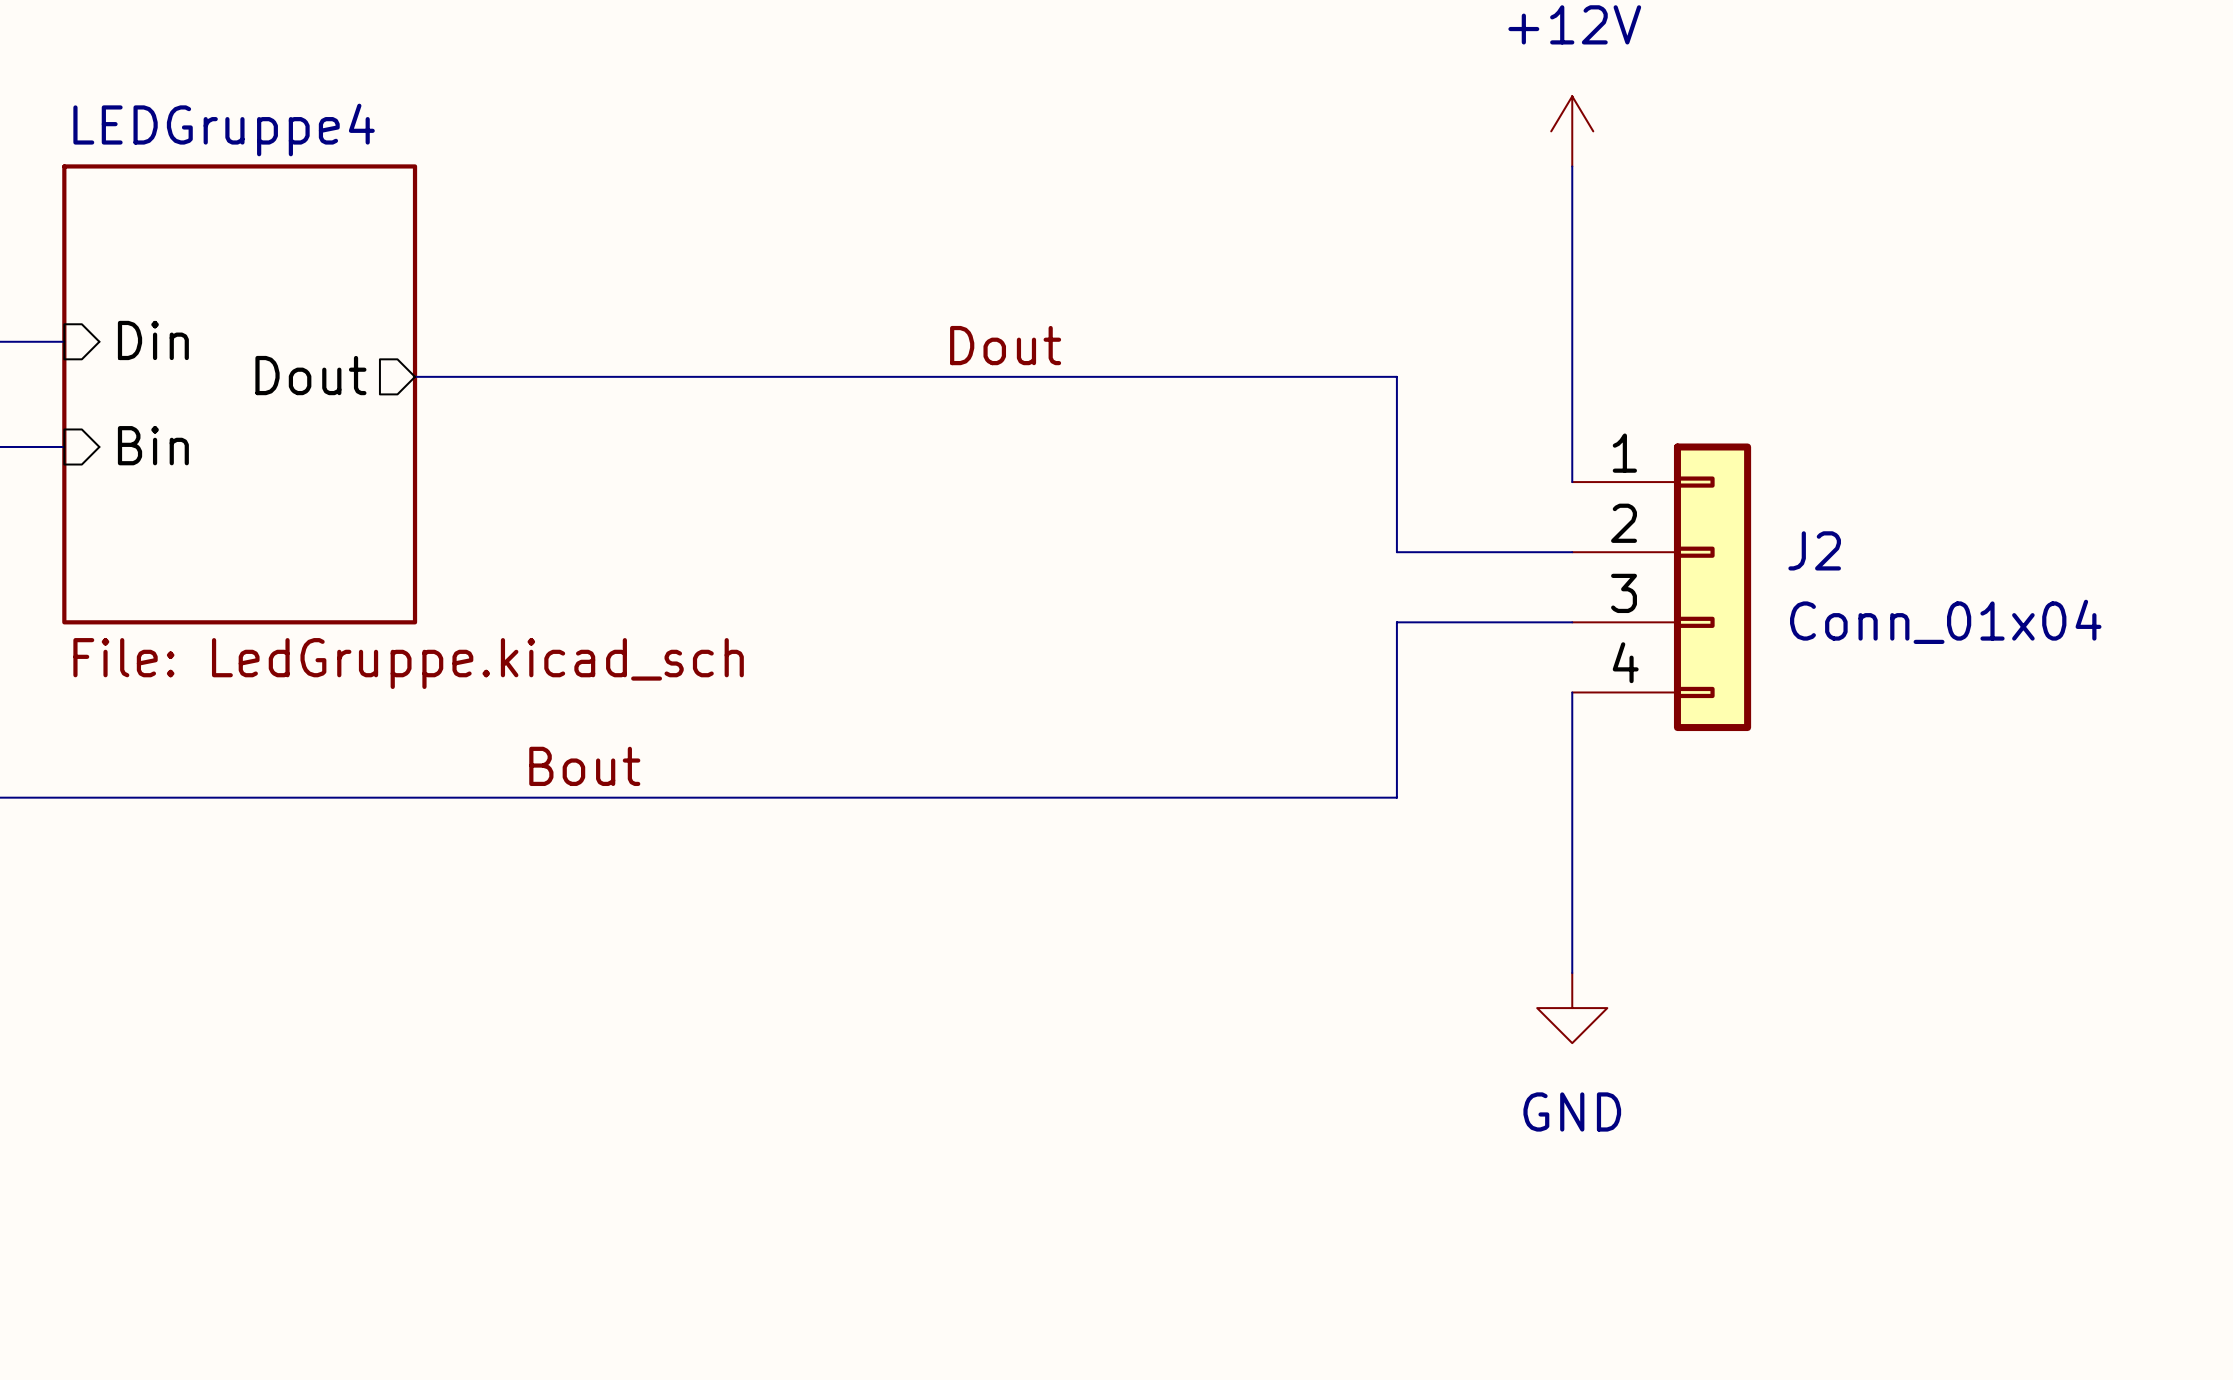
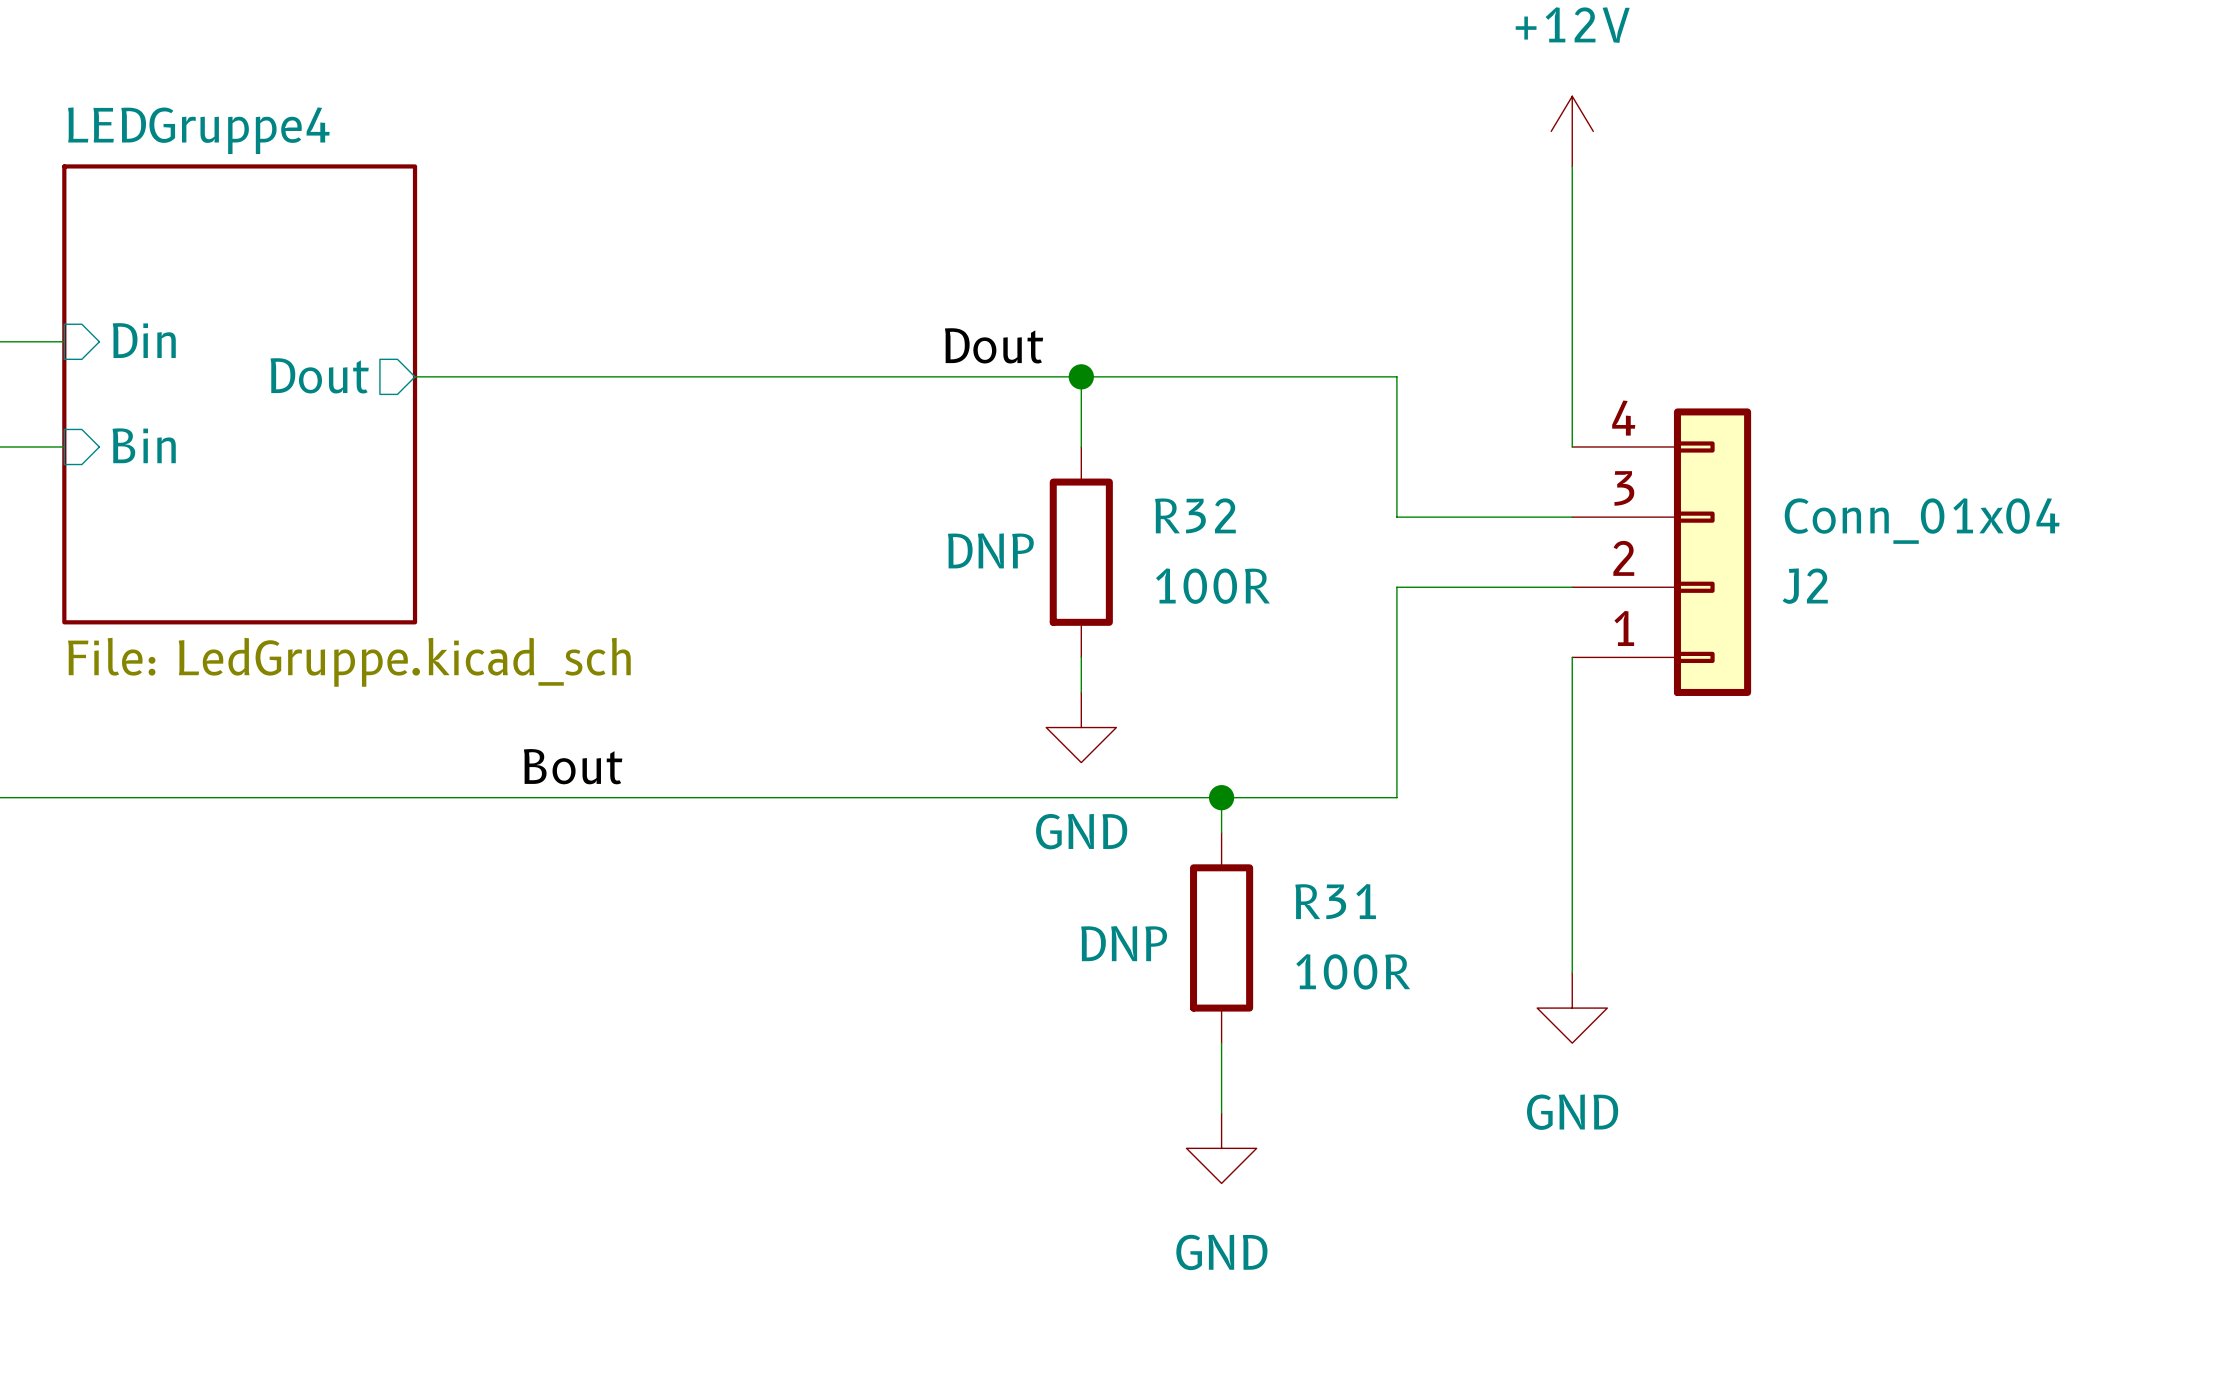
wire: none -> (1081, 376) (1081, 446)
junction: none -> (1081, 376)
wire: (1572, 446) (1572, 482) -> (1572, 657) (1572, 692)
wire: (1396, 517) (1396, 552) (1572, 552) -> (1396, 517) (1572, 517)
R32: none -> 100R (1081, 552)
J2 flip: as is (1712, 587) -> up-down (1712, 552)
wire: (1396, 622) (1572, 622) -> (1396, 622) (1396, 587) (1572, 587)
wire: none -> (1081, 657) (1081, 692)
power symbol: none -> GND (1081, 727)
wire: none -> (1221, 797) (1221, 832)
junction: none -> (1221, 797)
R31: none -> 100R (1221, 937)
wire: none -> (1221, 1043) (1221, 1113)
power symbol: none -> GND (1221, 1148)

